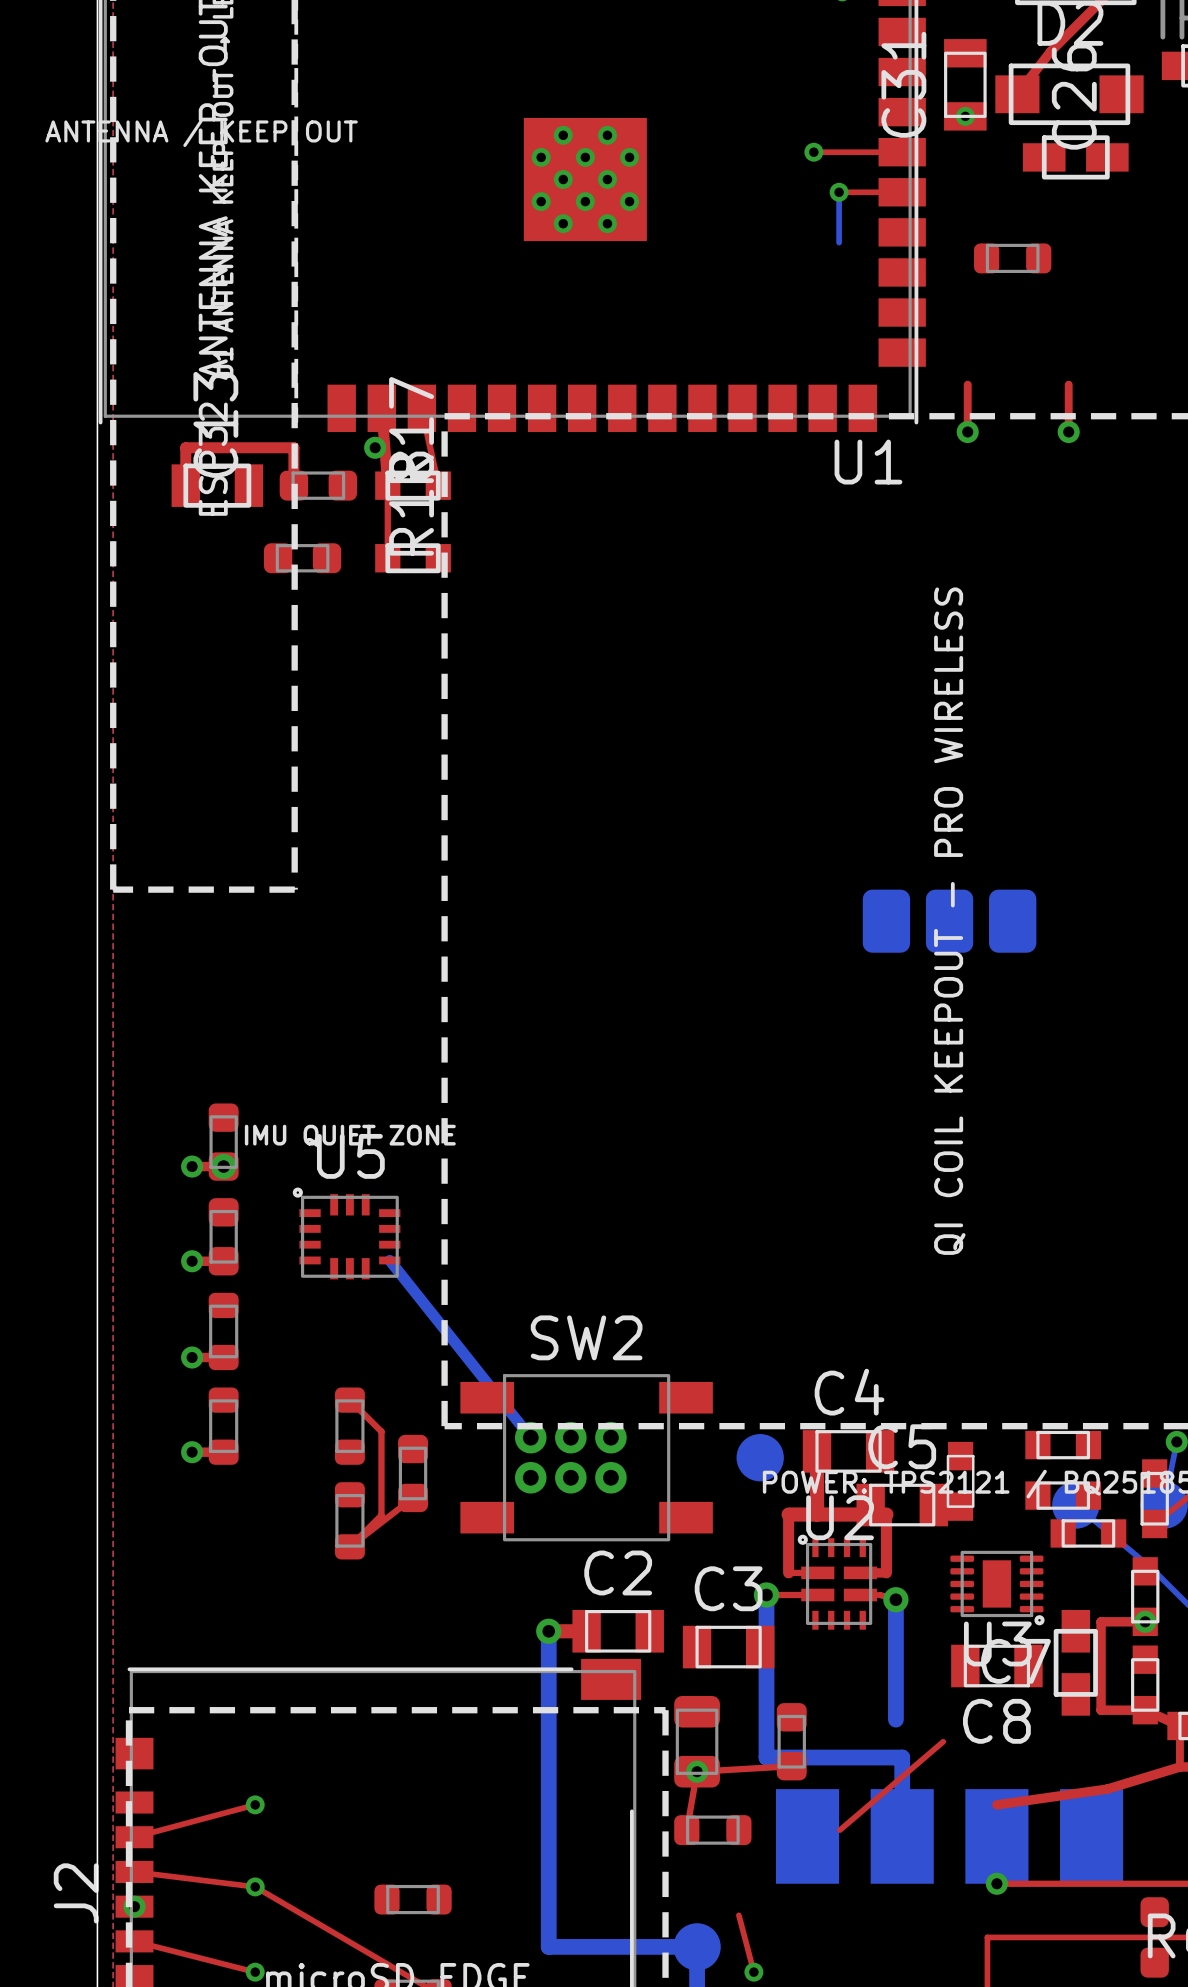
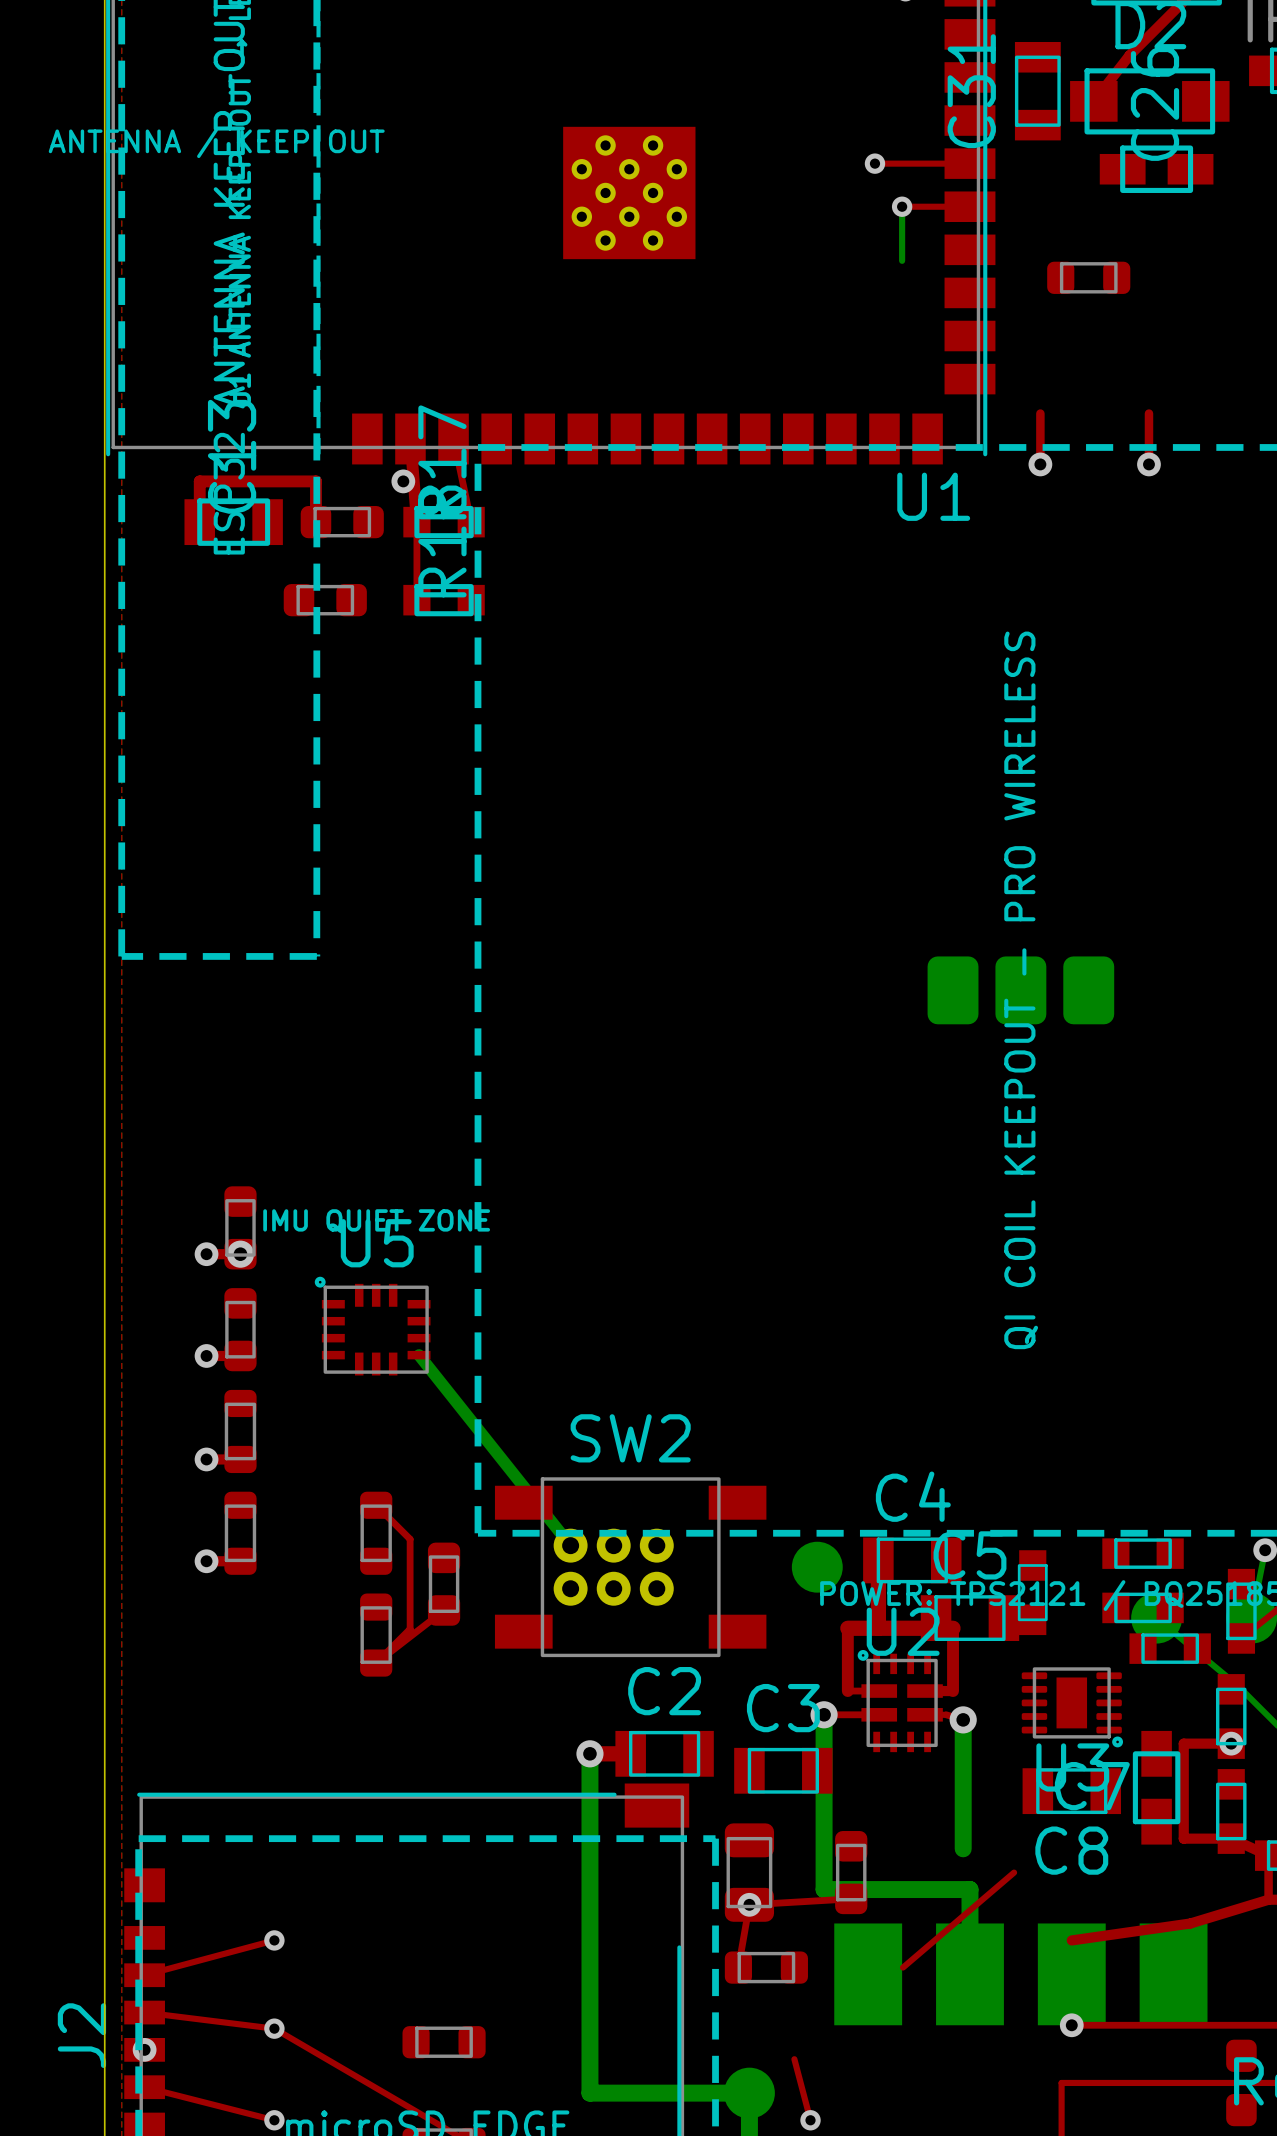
via: (965, 116) -> none

